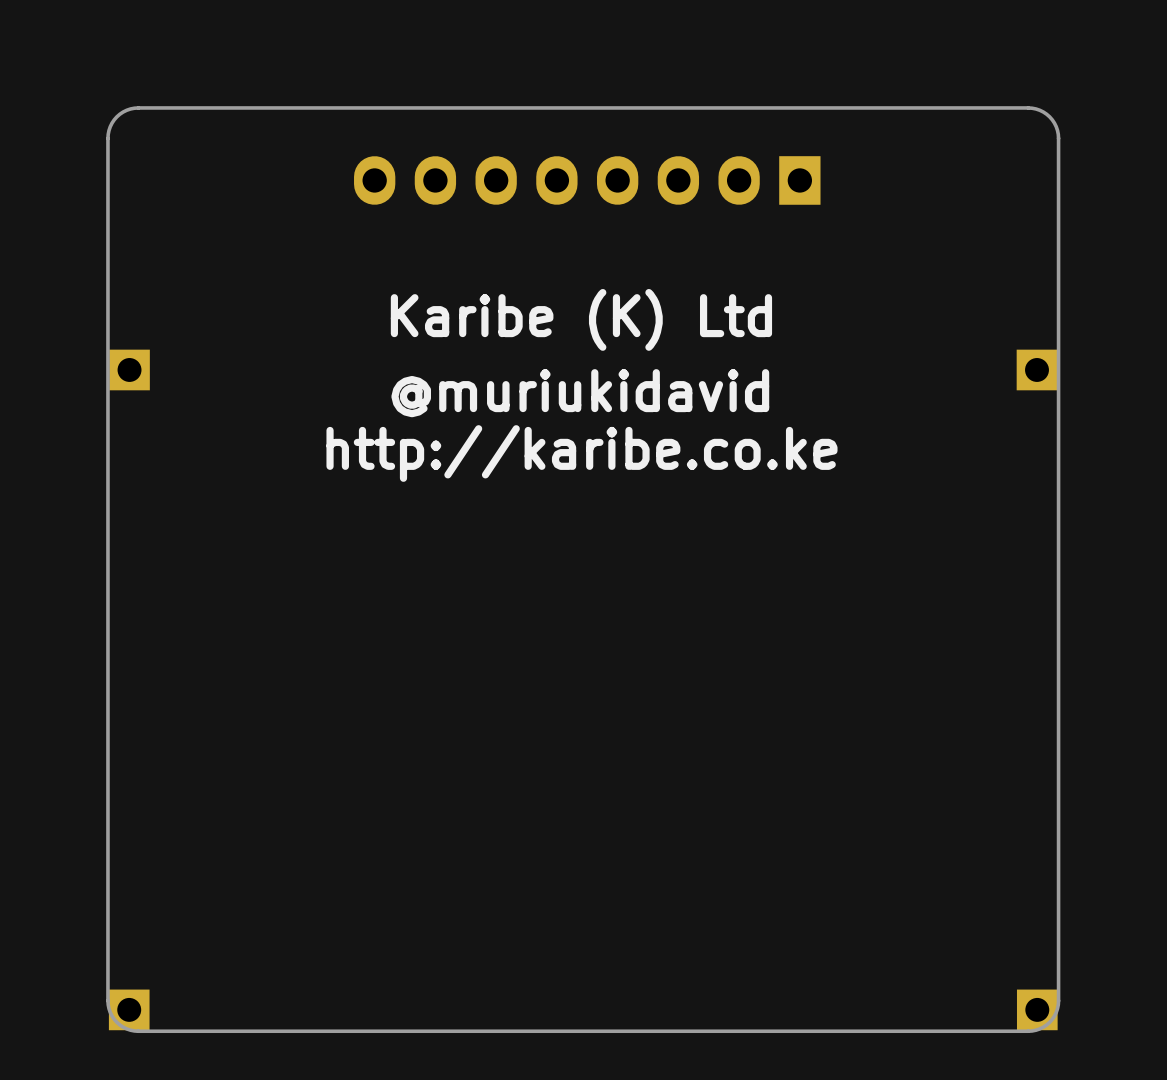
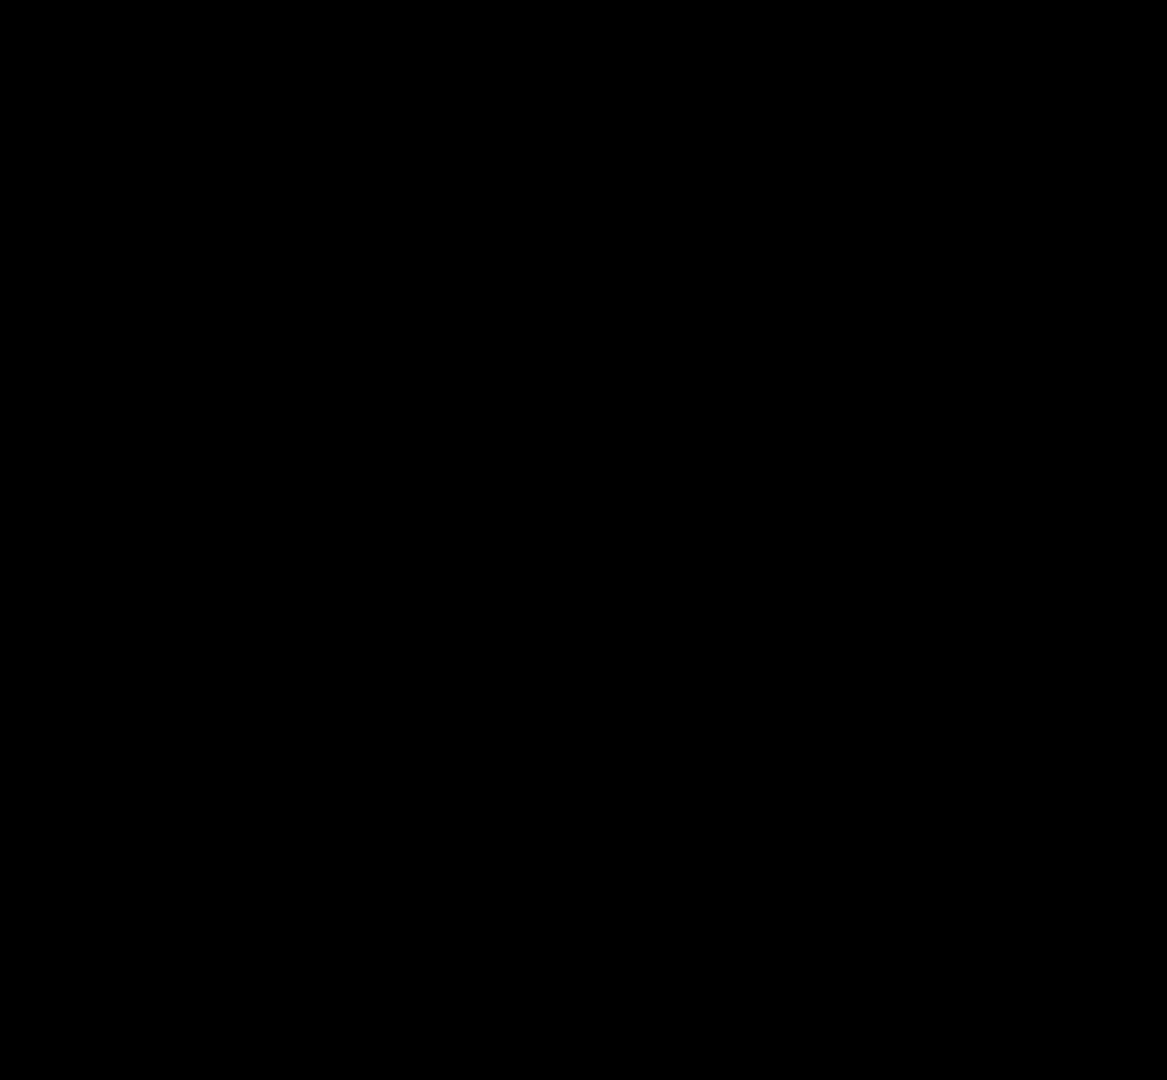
board edge: (1028, 107) (138, 107) (126, 110) (116, 116) (110, 126) (107, 138) (107, 1000) (110, 1012) (116, 1022) (126, 1028) (138, 1031) (1028, 1031) (1039, 1028) (1049, 1022) (1056, 1012) (1058, 1000) (1058, 138) (1056, 126) (1049, 116) (1039, 110) (1028, 107) -> none
part: (587, 180) -> none
text: Karibe (K) Ltd (581, 319) -> none
part: (129, 369) -> none
part: (1037, 369) -> none
text: @muriukidavid (580, 393) -> none
text: http://karibe.co.ke (581, 453) -> none
part: (129, 1009) -> none
part: (1037, 1009) -> none

